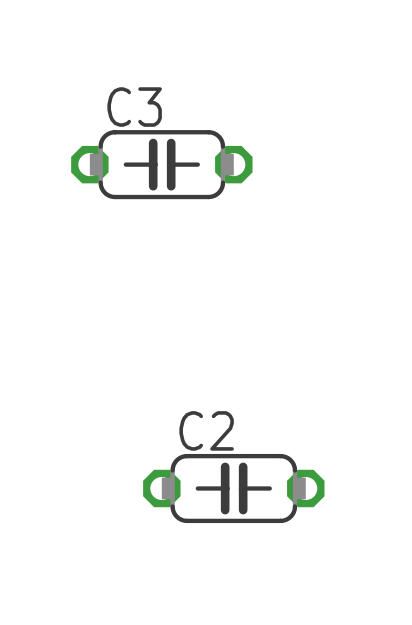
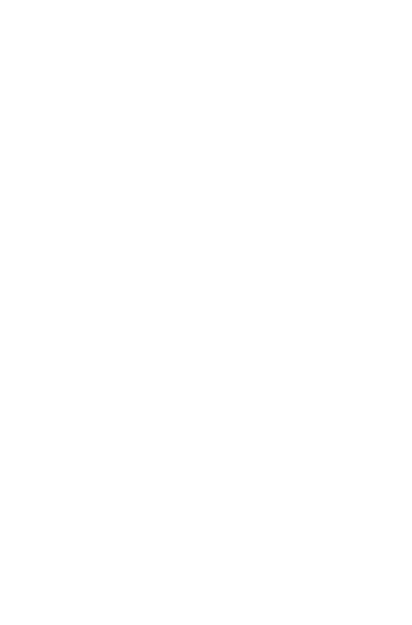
C3: (161, 164) -> none
C2: (233, 488) -> none

